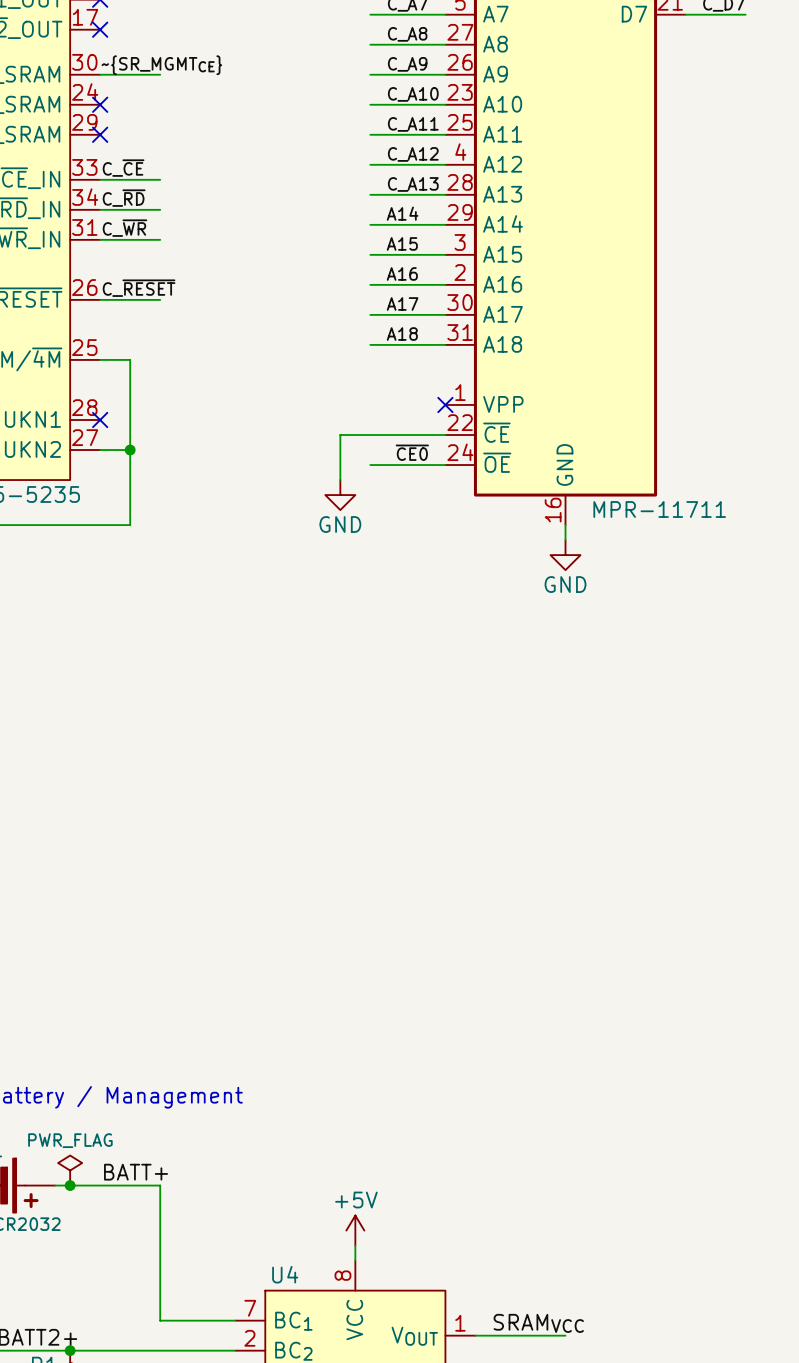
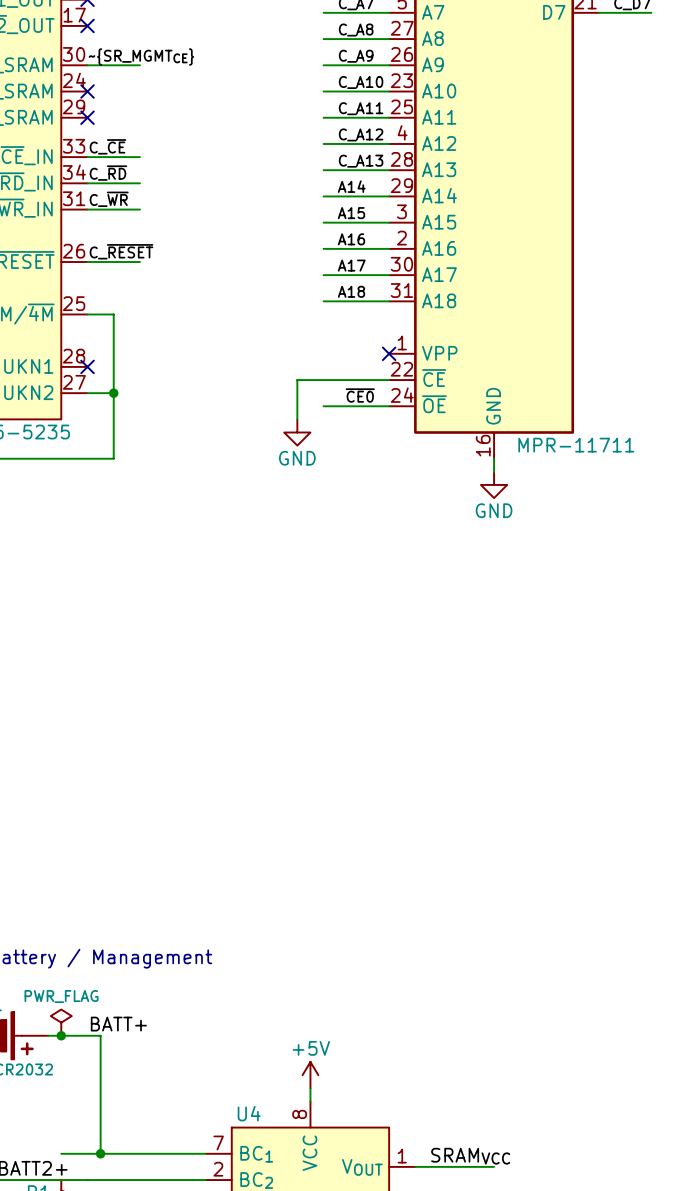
wire: (115, 1185) (160, 1185) (160, 1320) -> (100, 1035) (100, 1153)
wire: none -> (61, 1153) (139, 1153)
junction: none -> (100, 1153)
junction: (70, 1350) -> none

